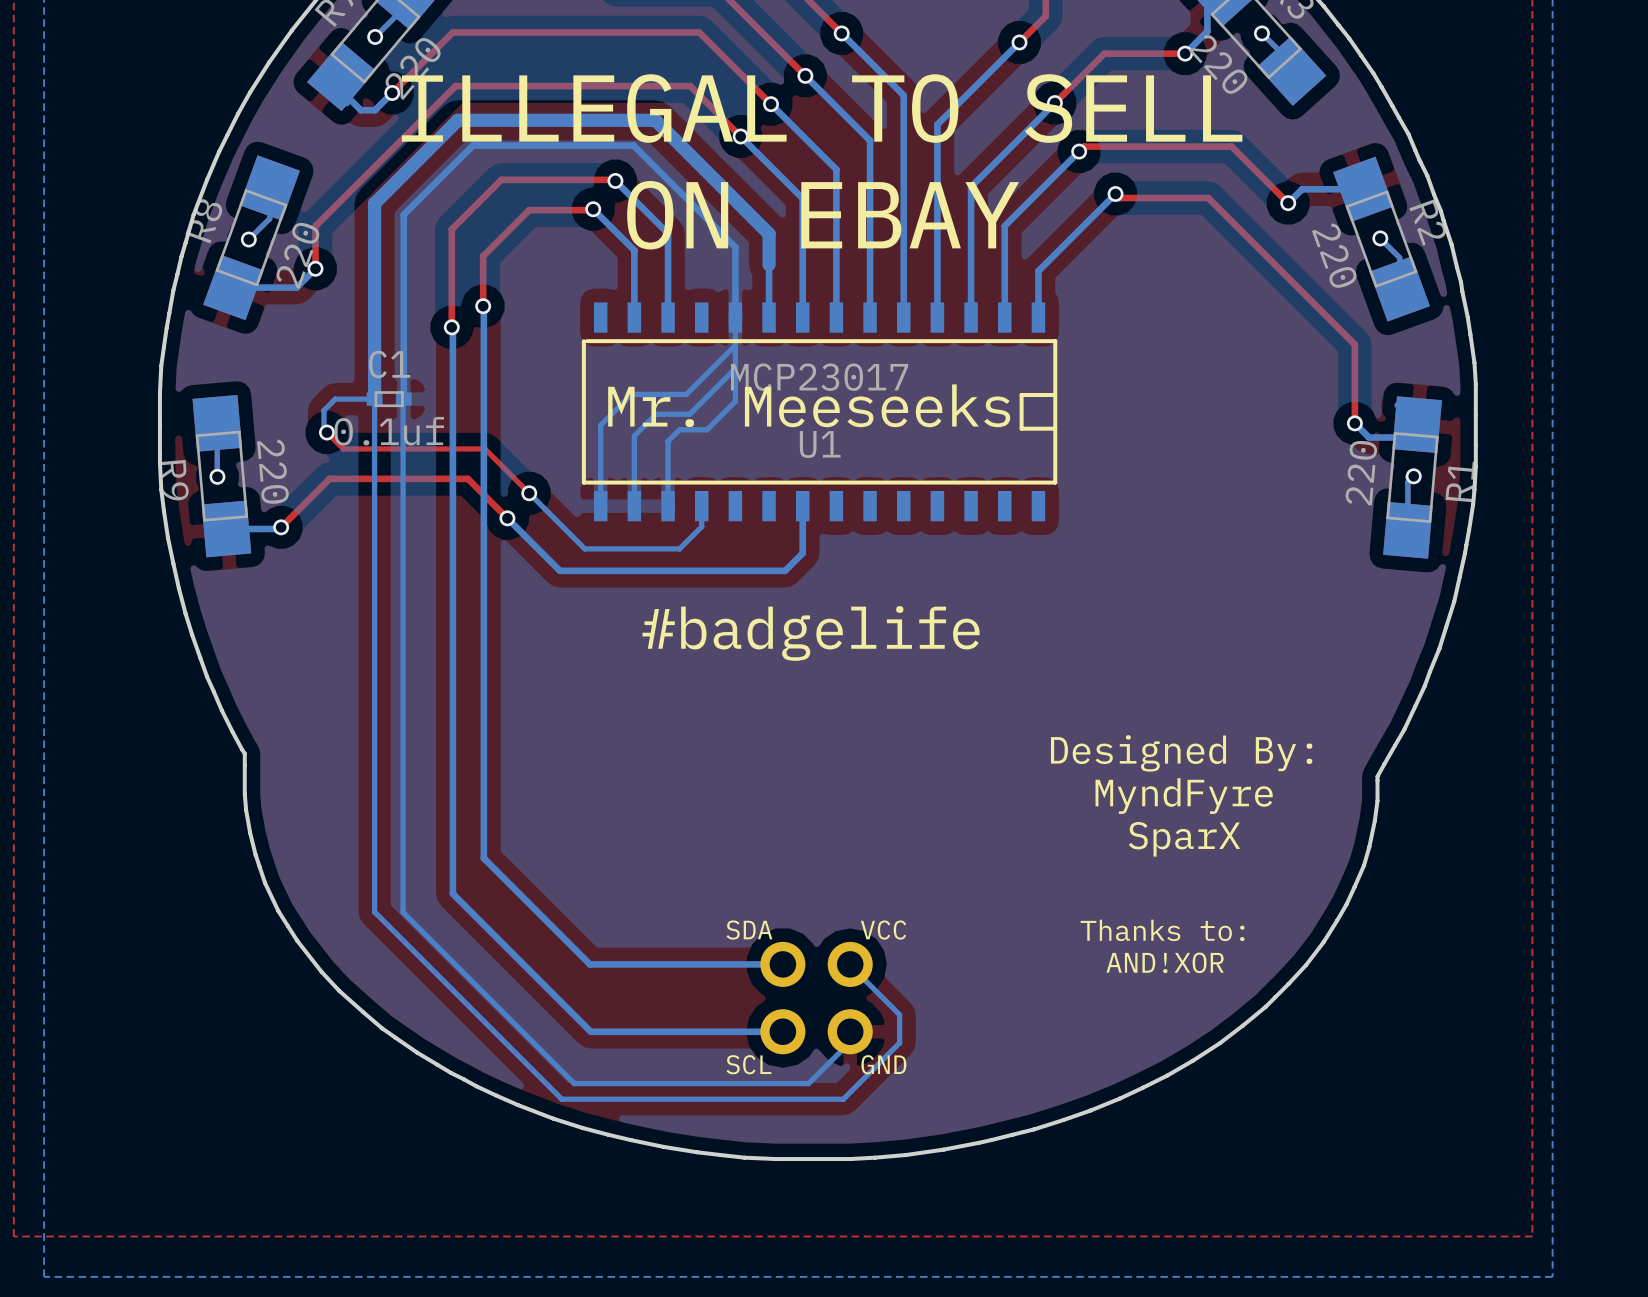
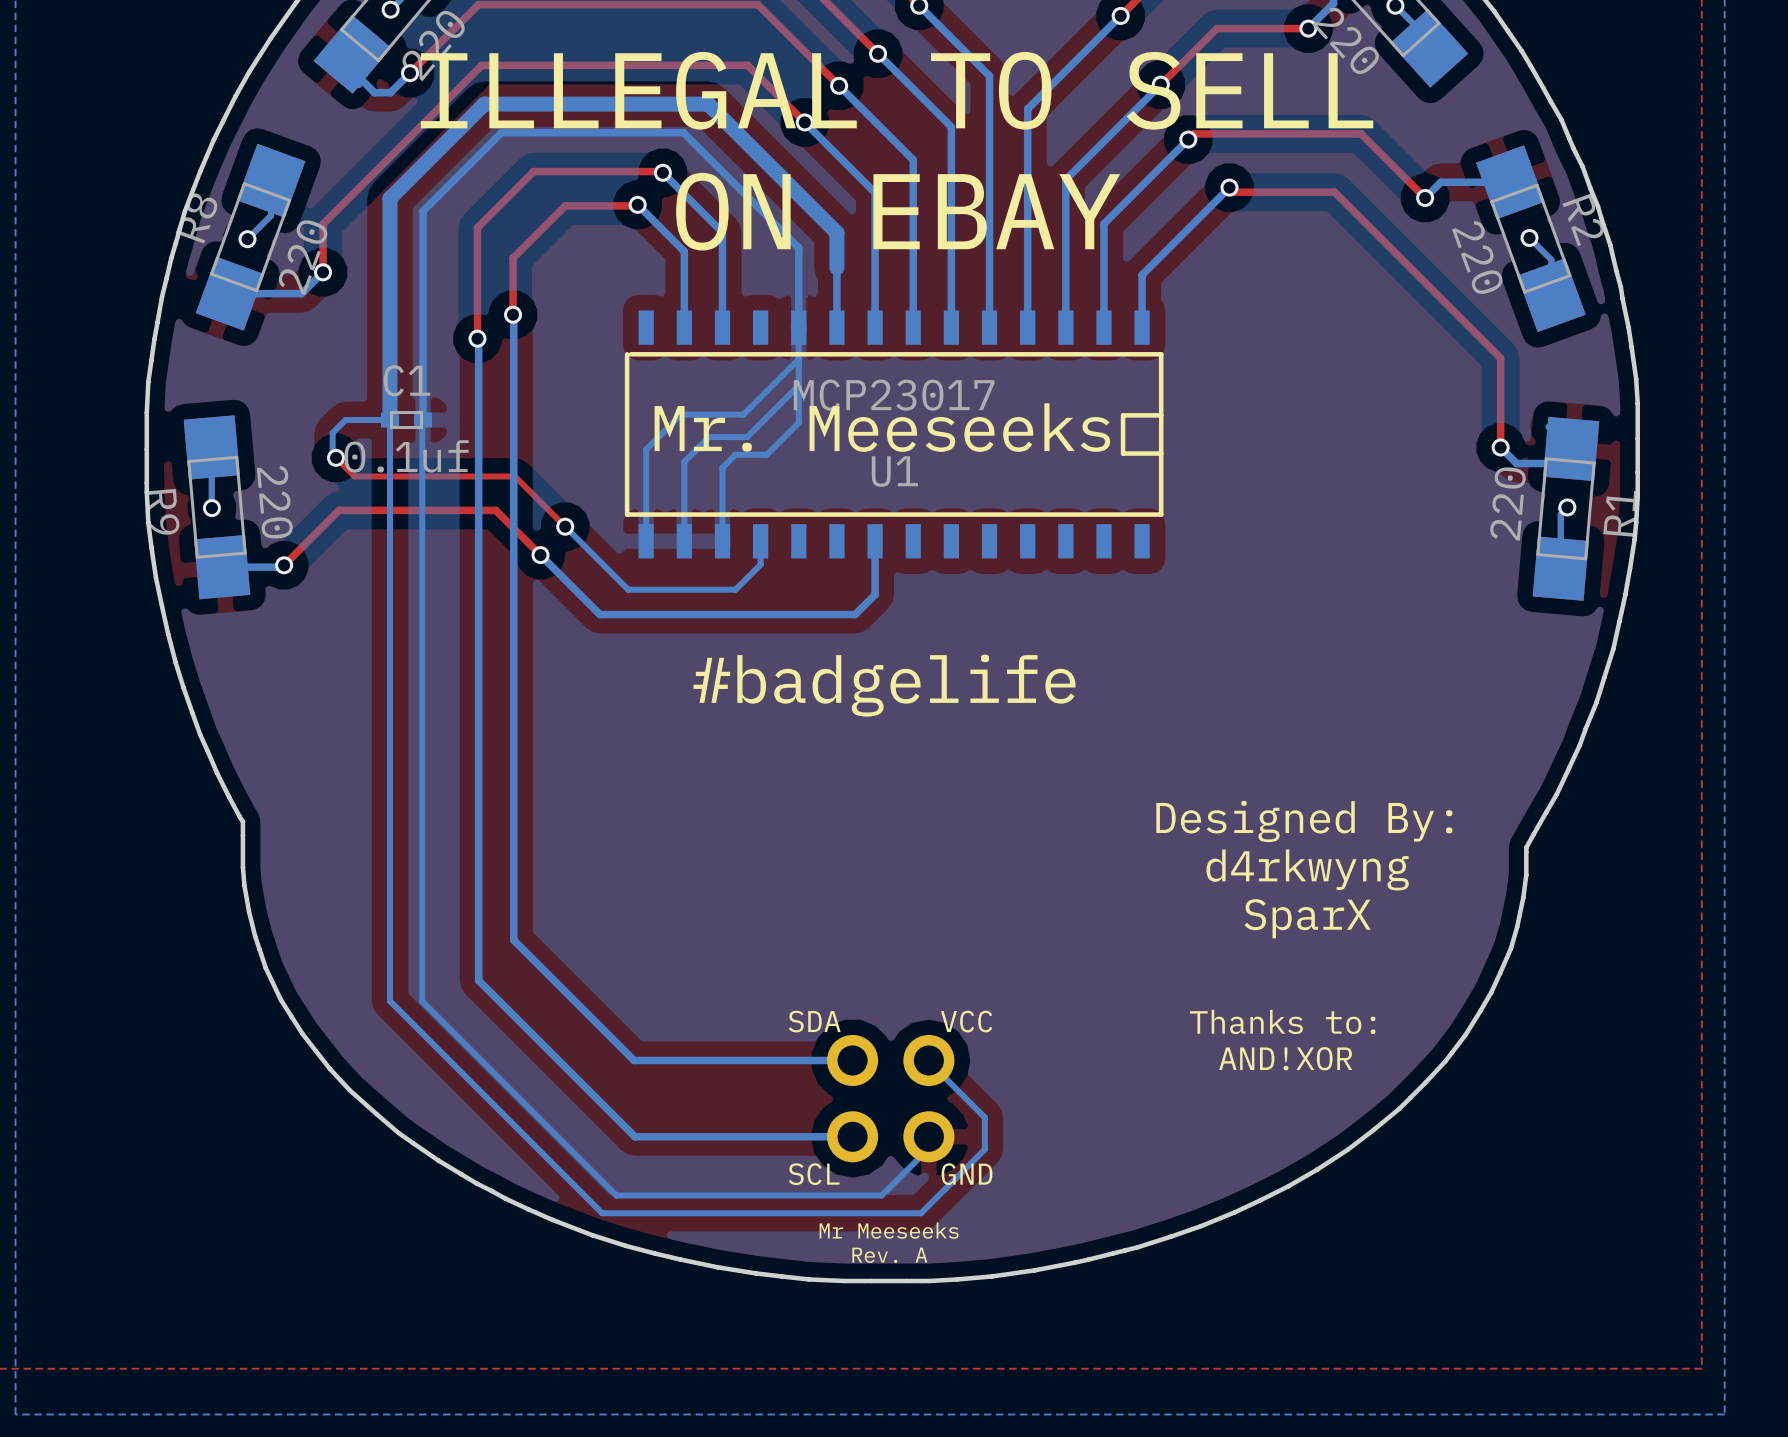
text: MyndFyre (1184, 796) -> d4rkwyng (1307, 869)
text: none -> Mr Meeseeks (889, 1230)
text: none -> Rev. A (889, 1255)

